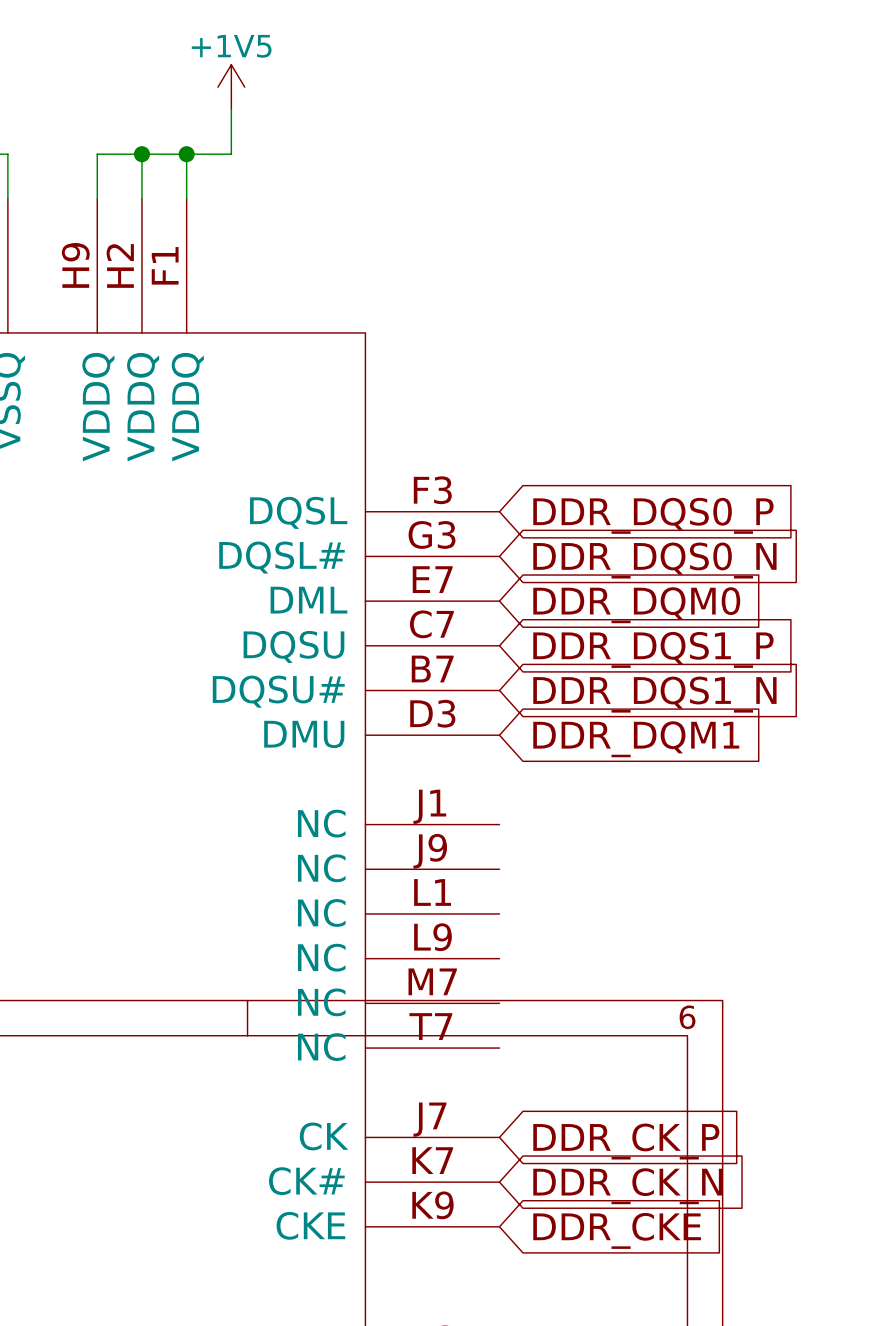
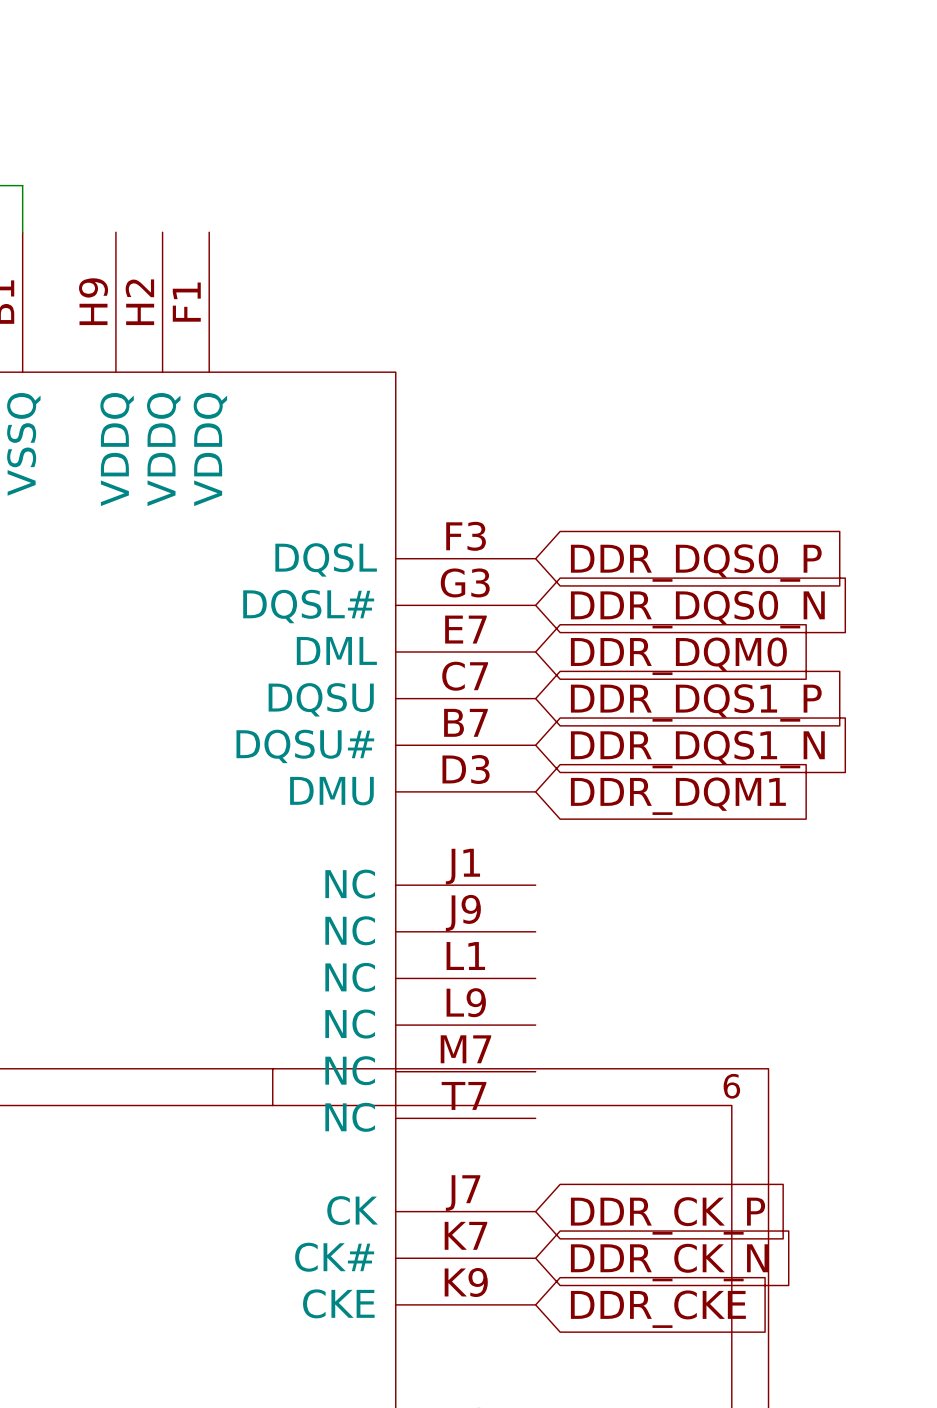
power symbol: +1V5 (231, 87) -> none
wire: (231, 109) (231, 154) (97, 154) (97, 198) -> none
wire: (141, 154) (141, 198) -> none
junction: (141, 154) -> none
wire: (186, 154) (186, 198) -> none
junction: (186, 154) -> none

